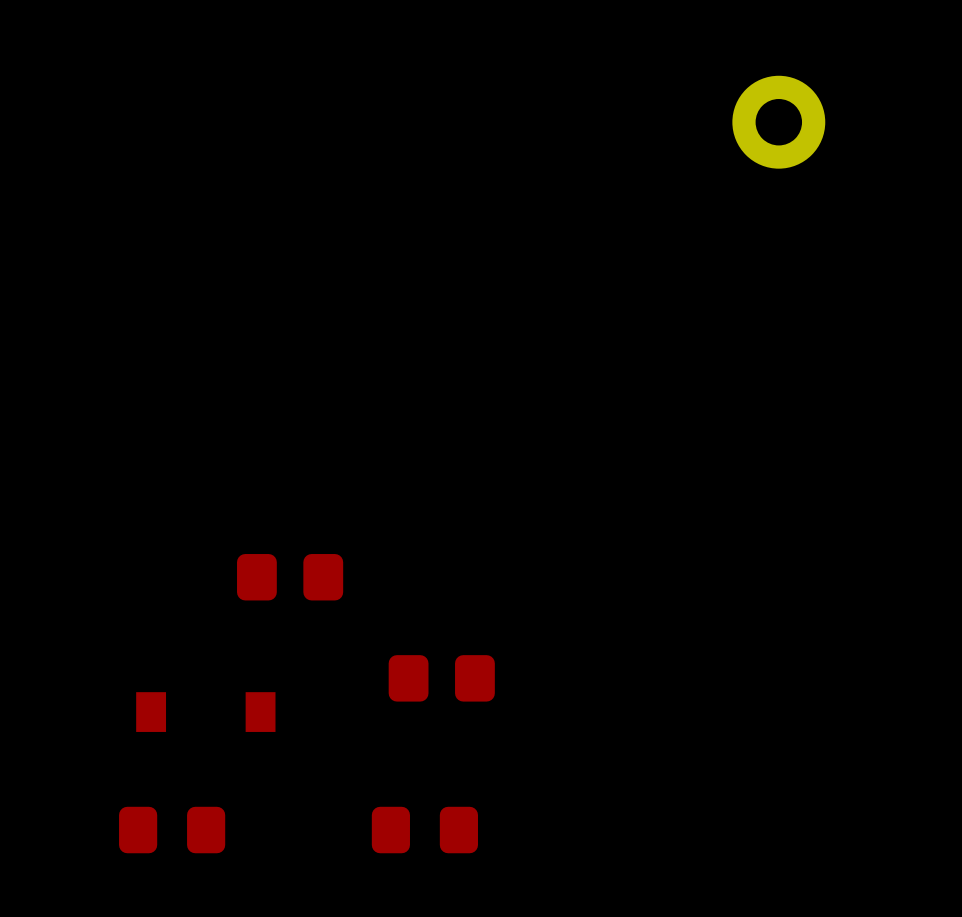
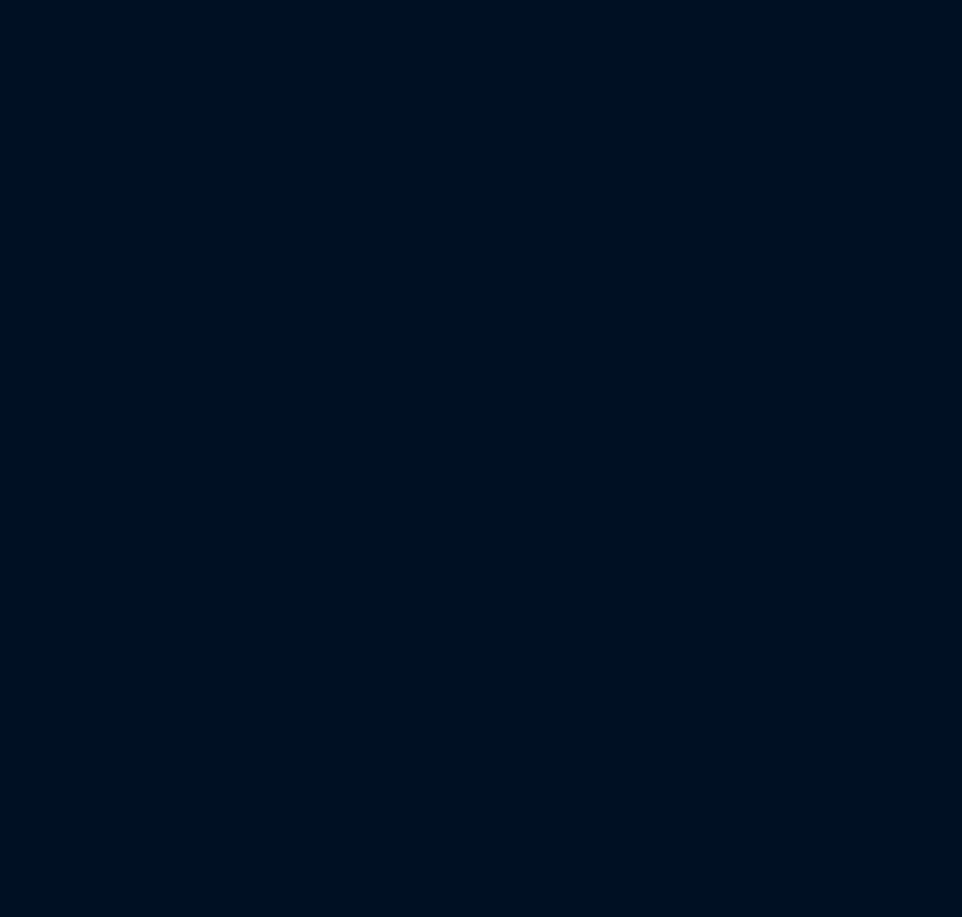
part: (778, 122) -> none
part: (290, 577) -> none
part: (441, 678) -> none
part: (205, 712) -> none
part: (172, 830) -> none
part: (424, 830) -> none

